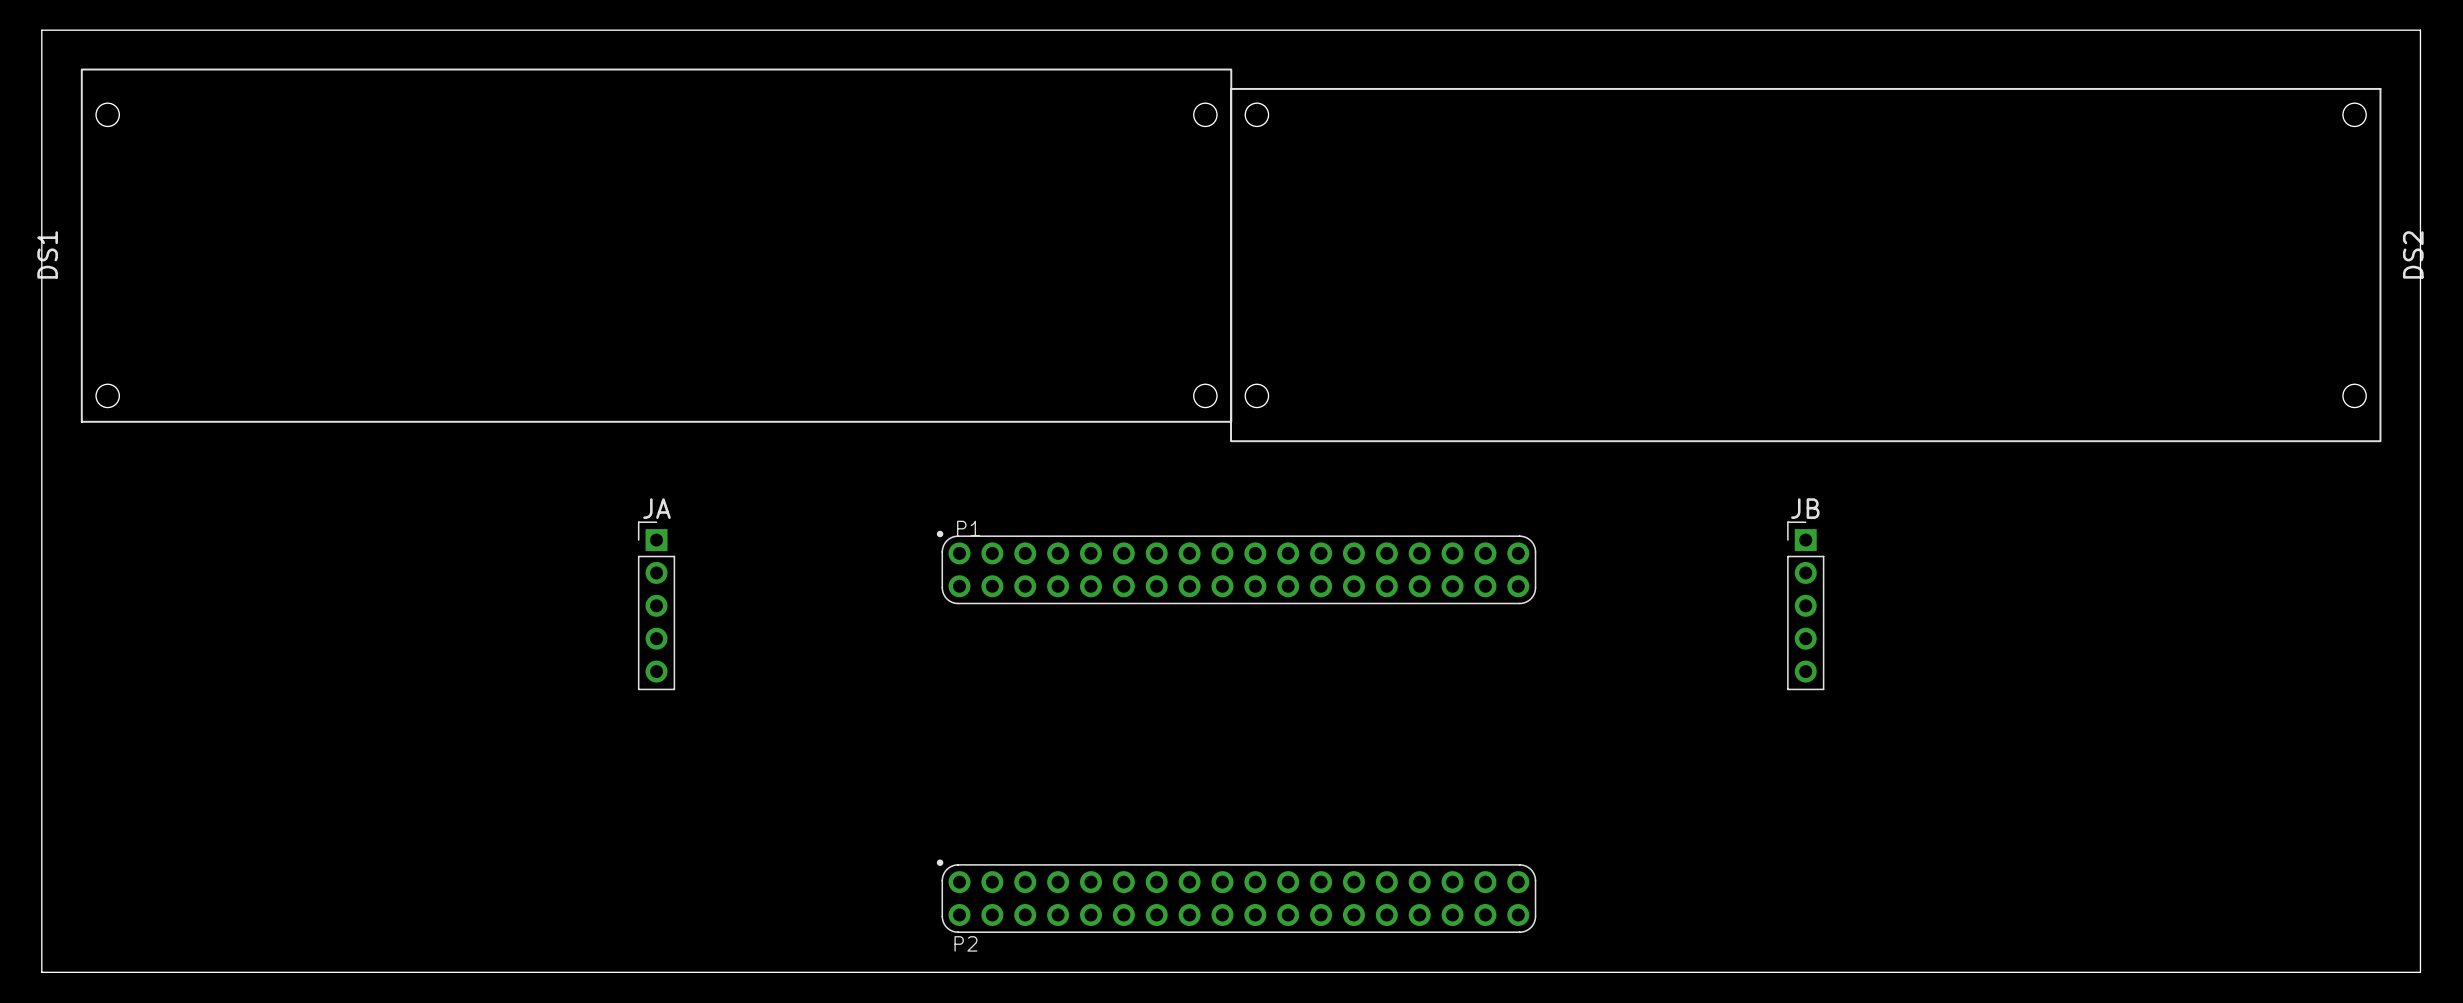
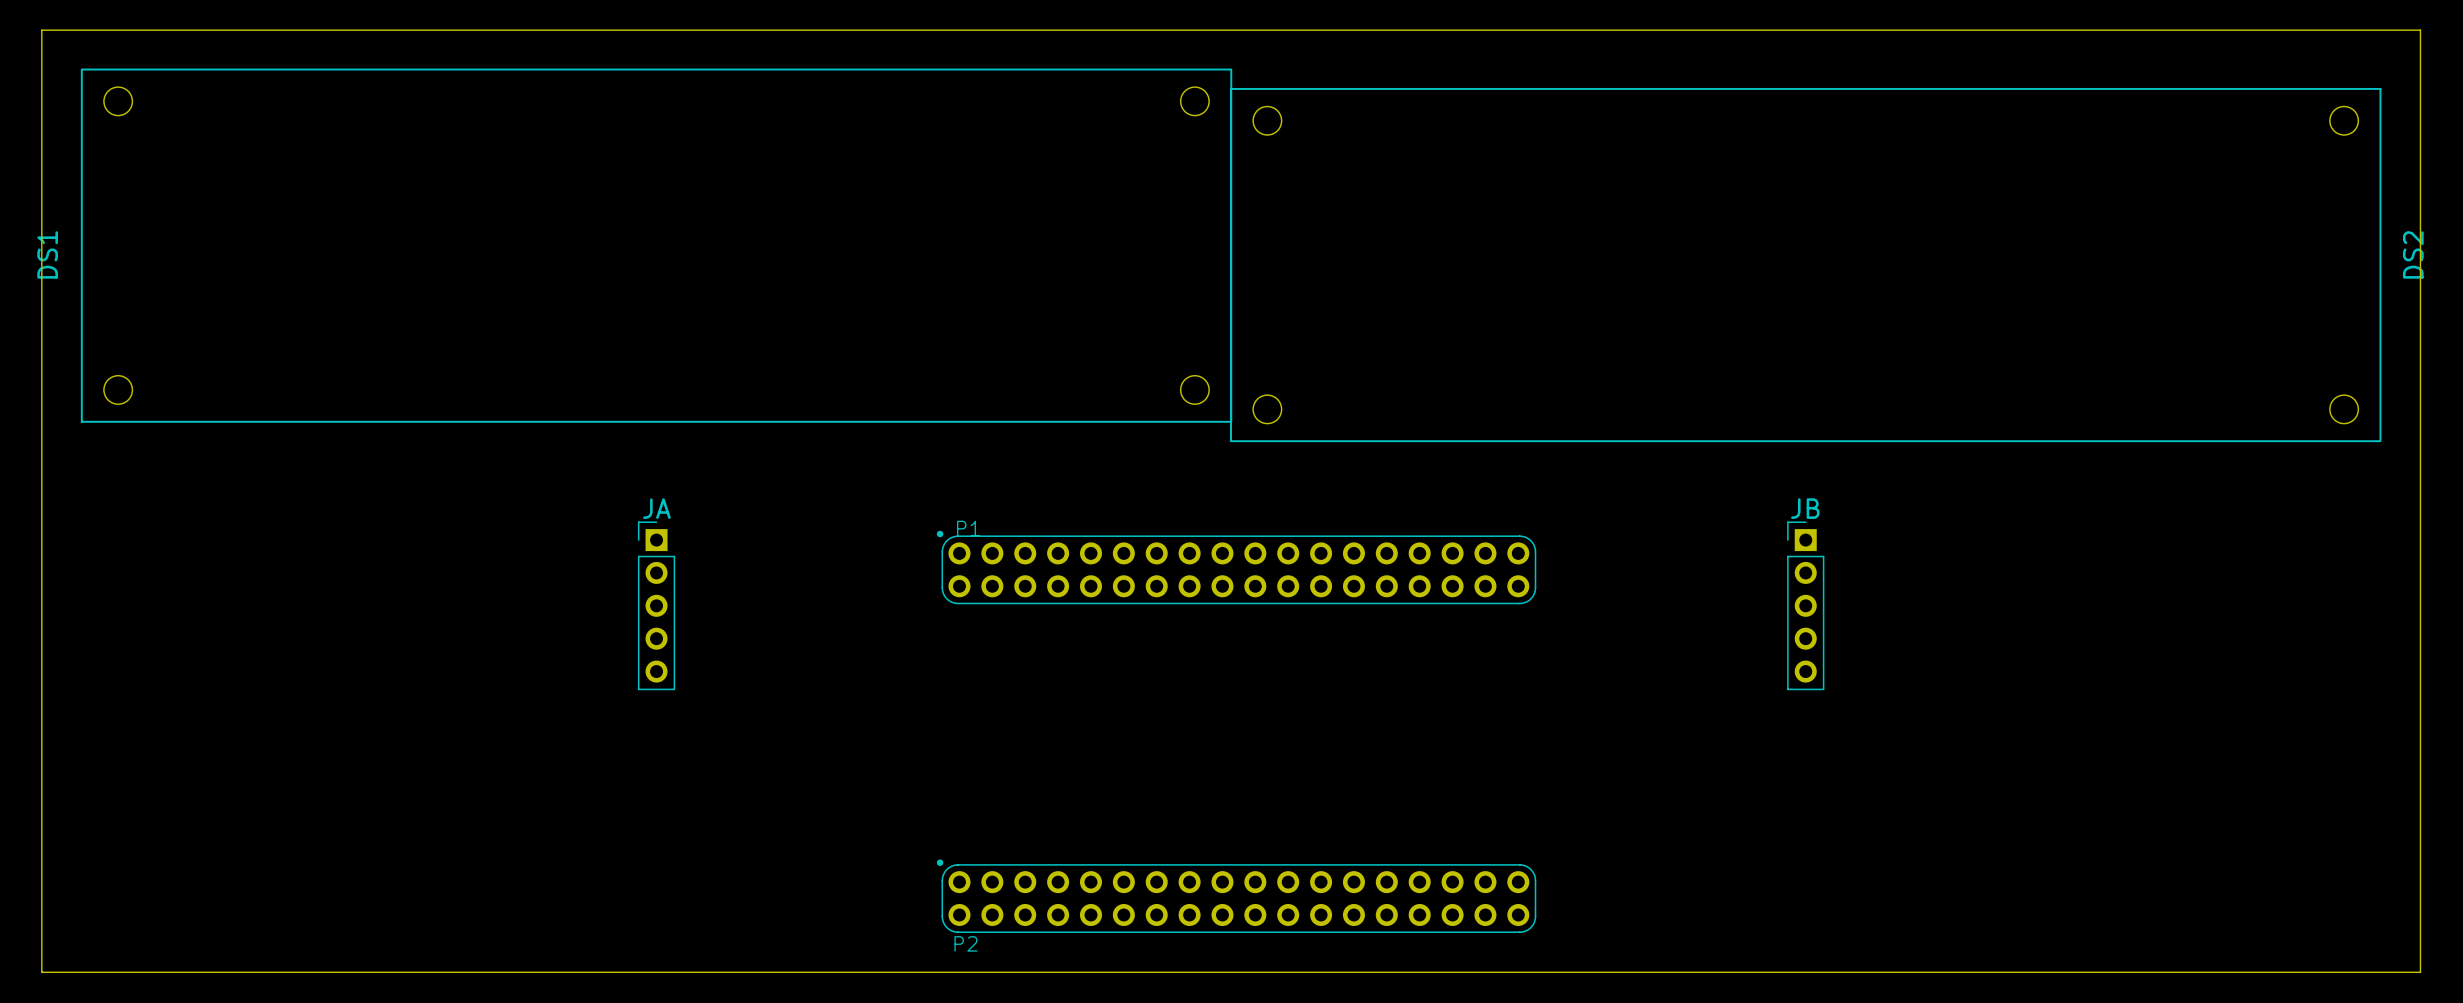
DS1 footprint: [80, 68, 1233, 423] -> [80, 68, 1233, 423]
DS2 footprint: [1230, 87, 2382, 443] -> [1230, 87, 2382, 443]

